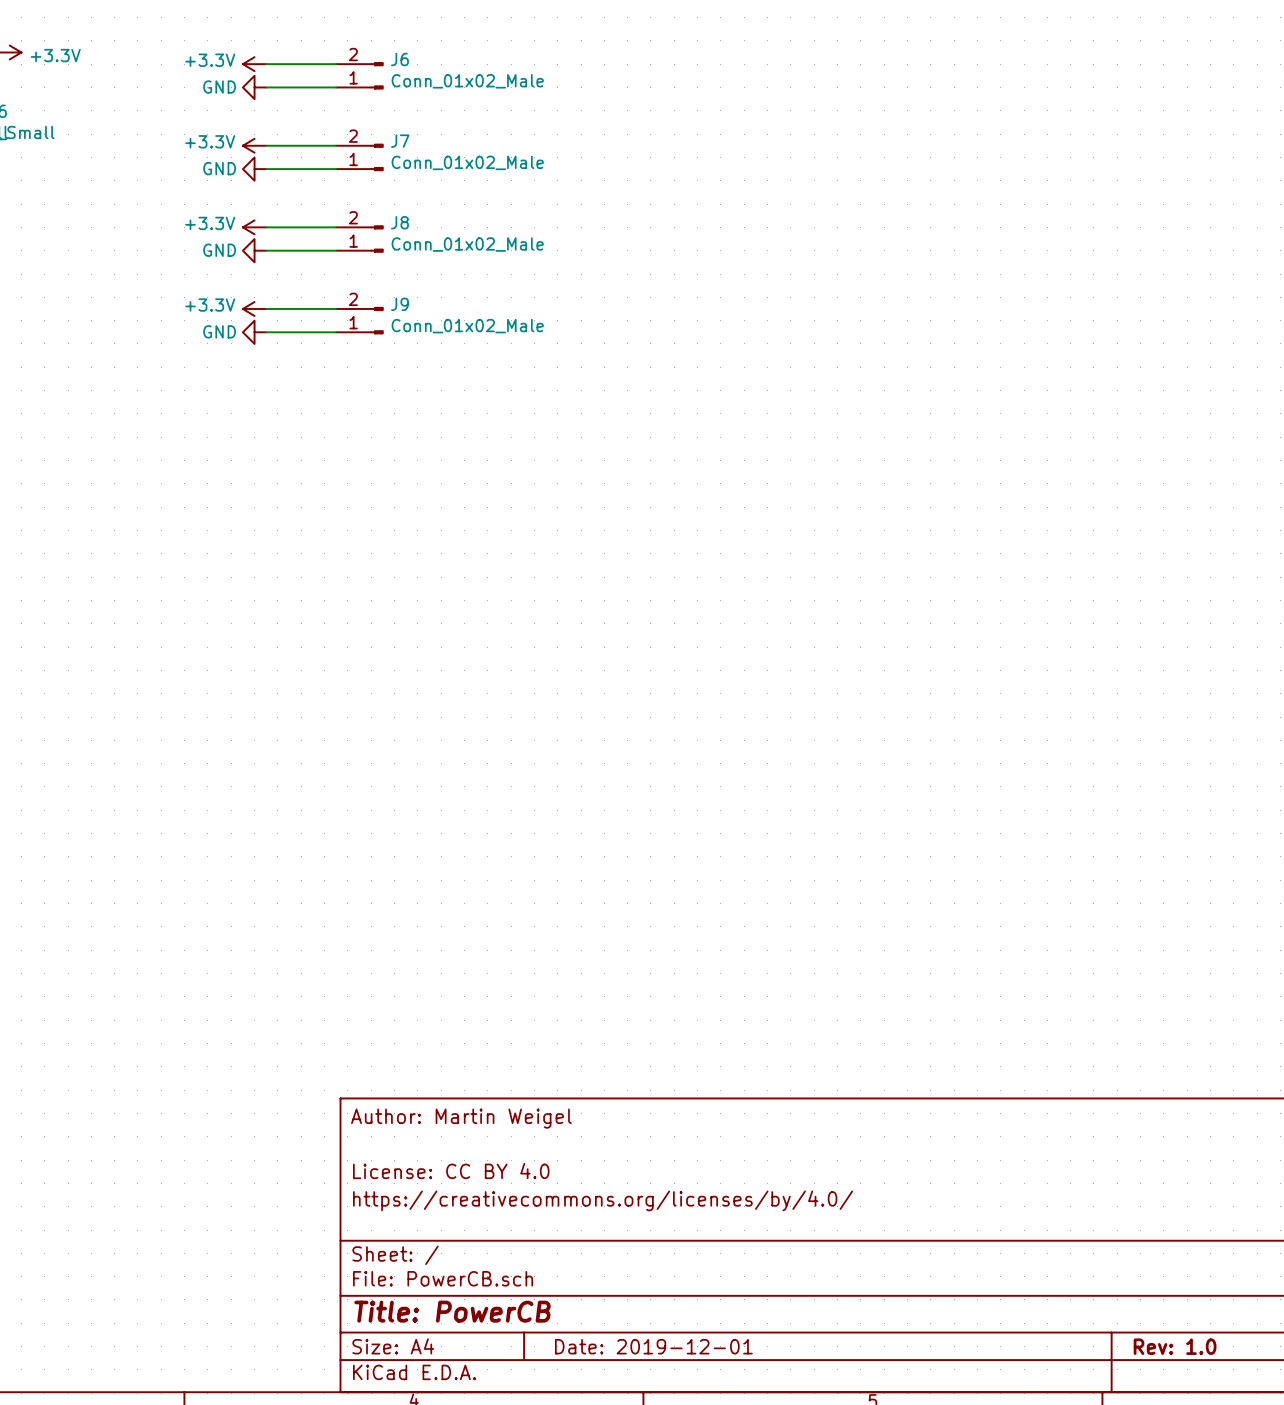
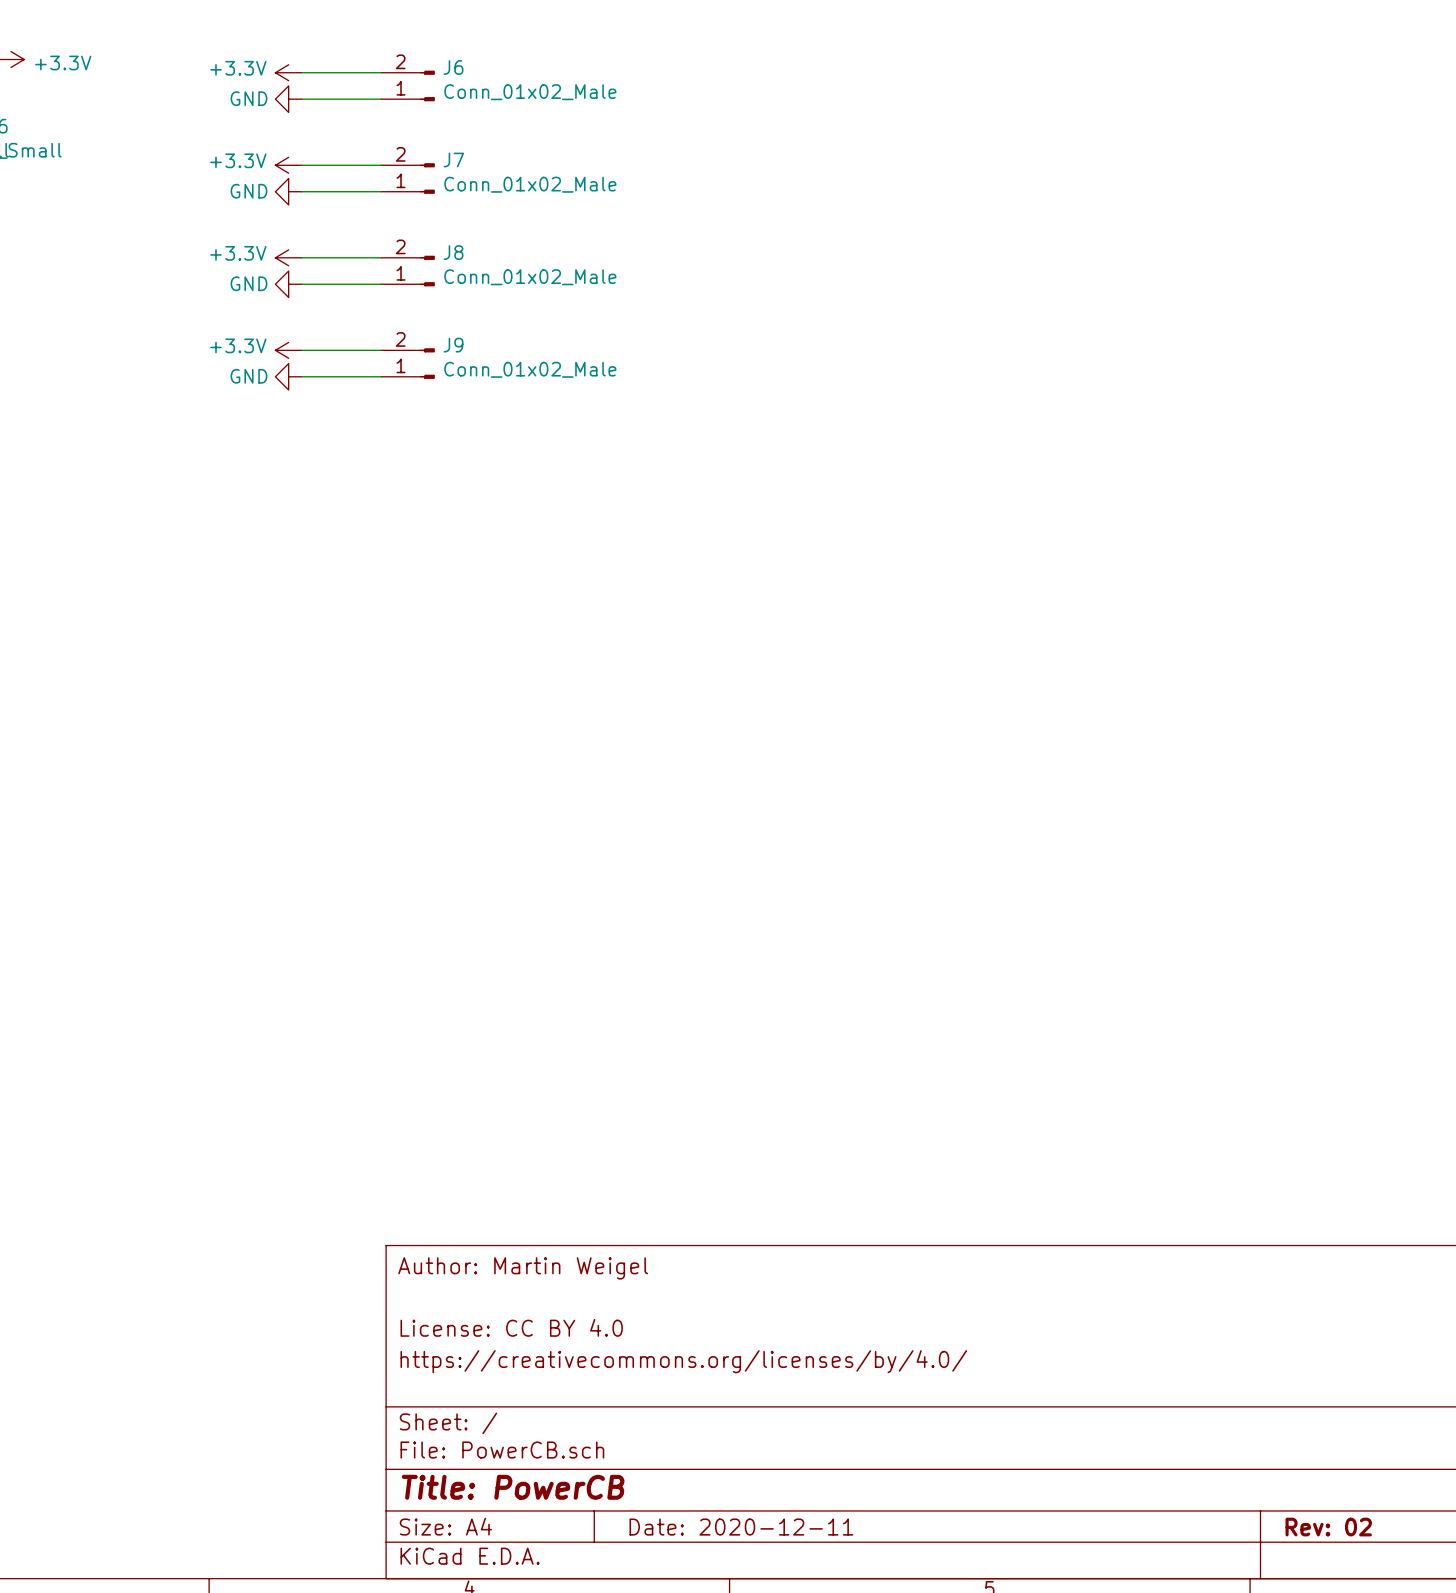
title block: Date: 2019-12-01 (653, 1346) -> Date: 2020-12-11 (741, 1527)
title block: Rev: 1.0 (1175, 1346) -> Rev: 02 (1328, 1527)

